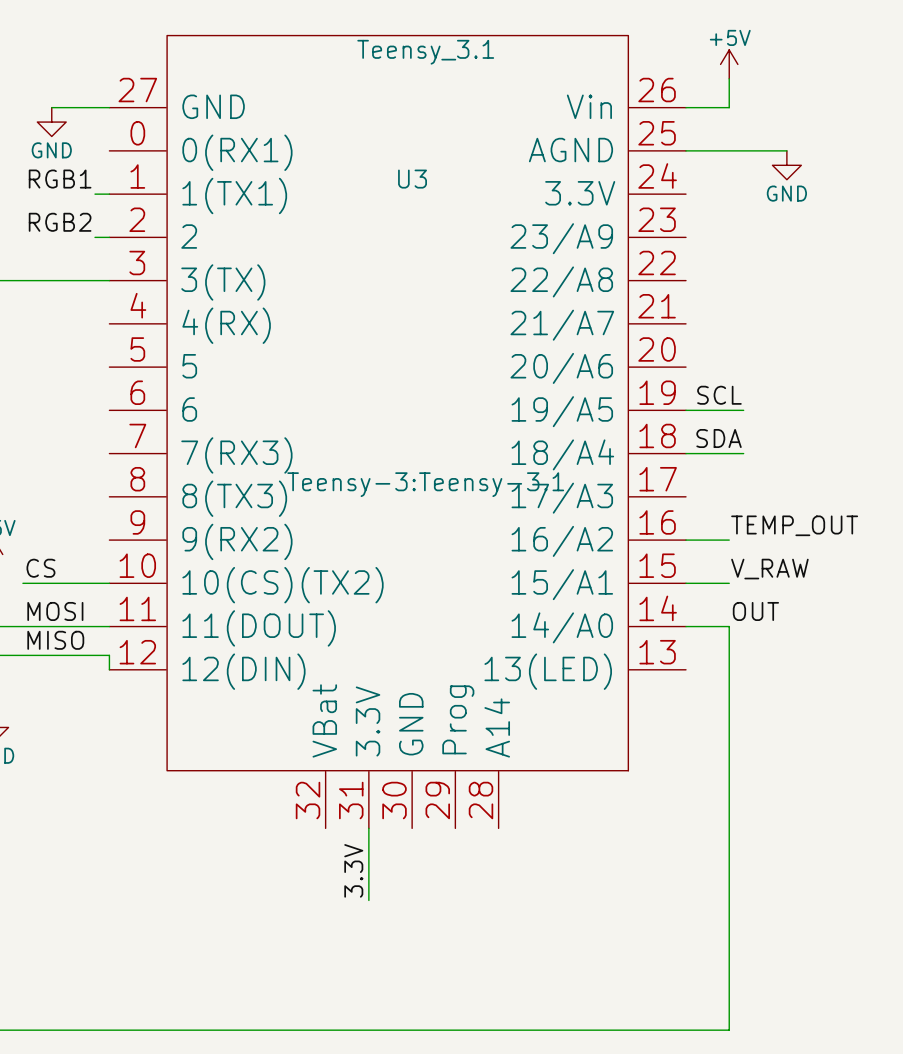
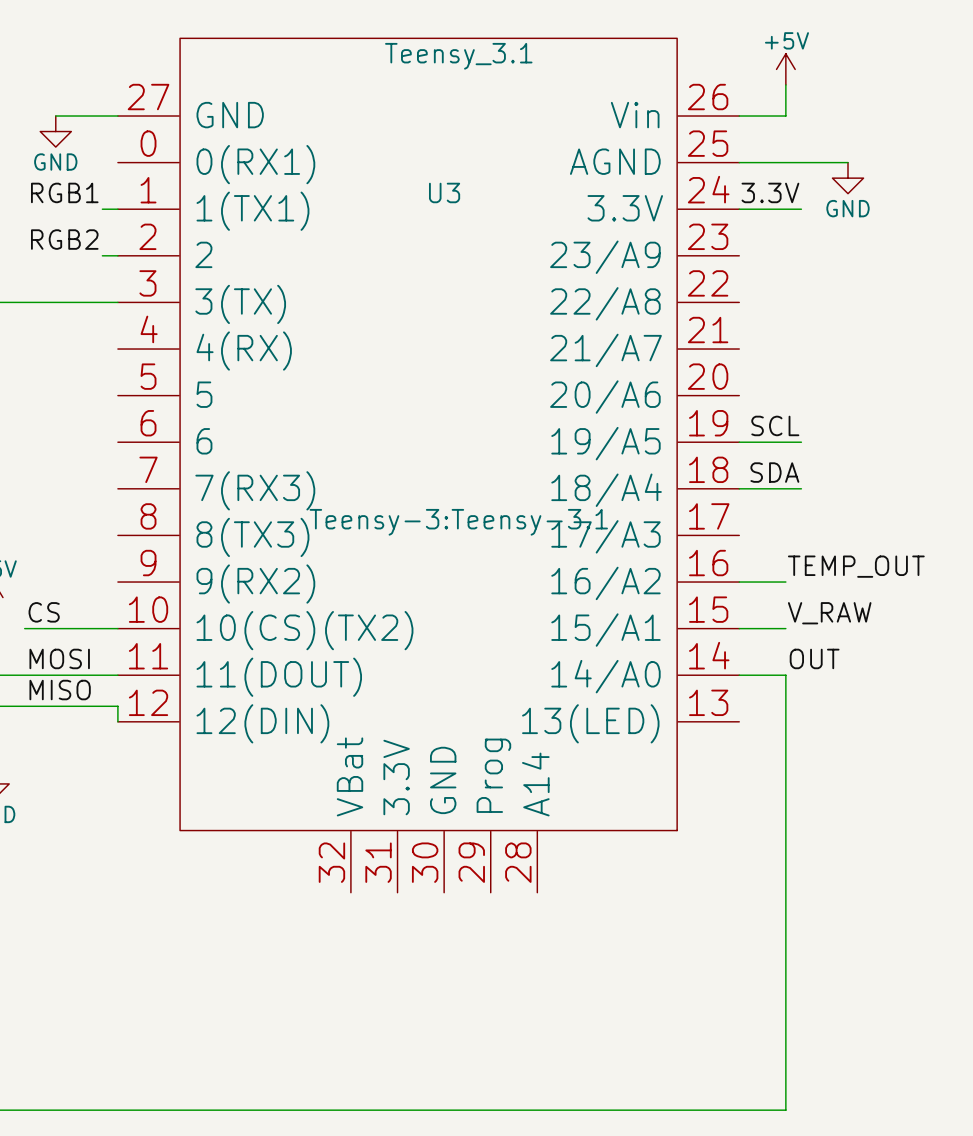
label: none -> 3.3V (770, 192)
wire: none -> (739, 209) (801, 209)
wire: (368, 828) (368, 900) -> none
label: 3.3V (353, 870) -> none

